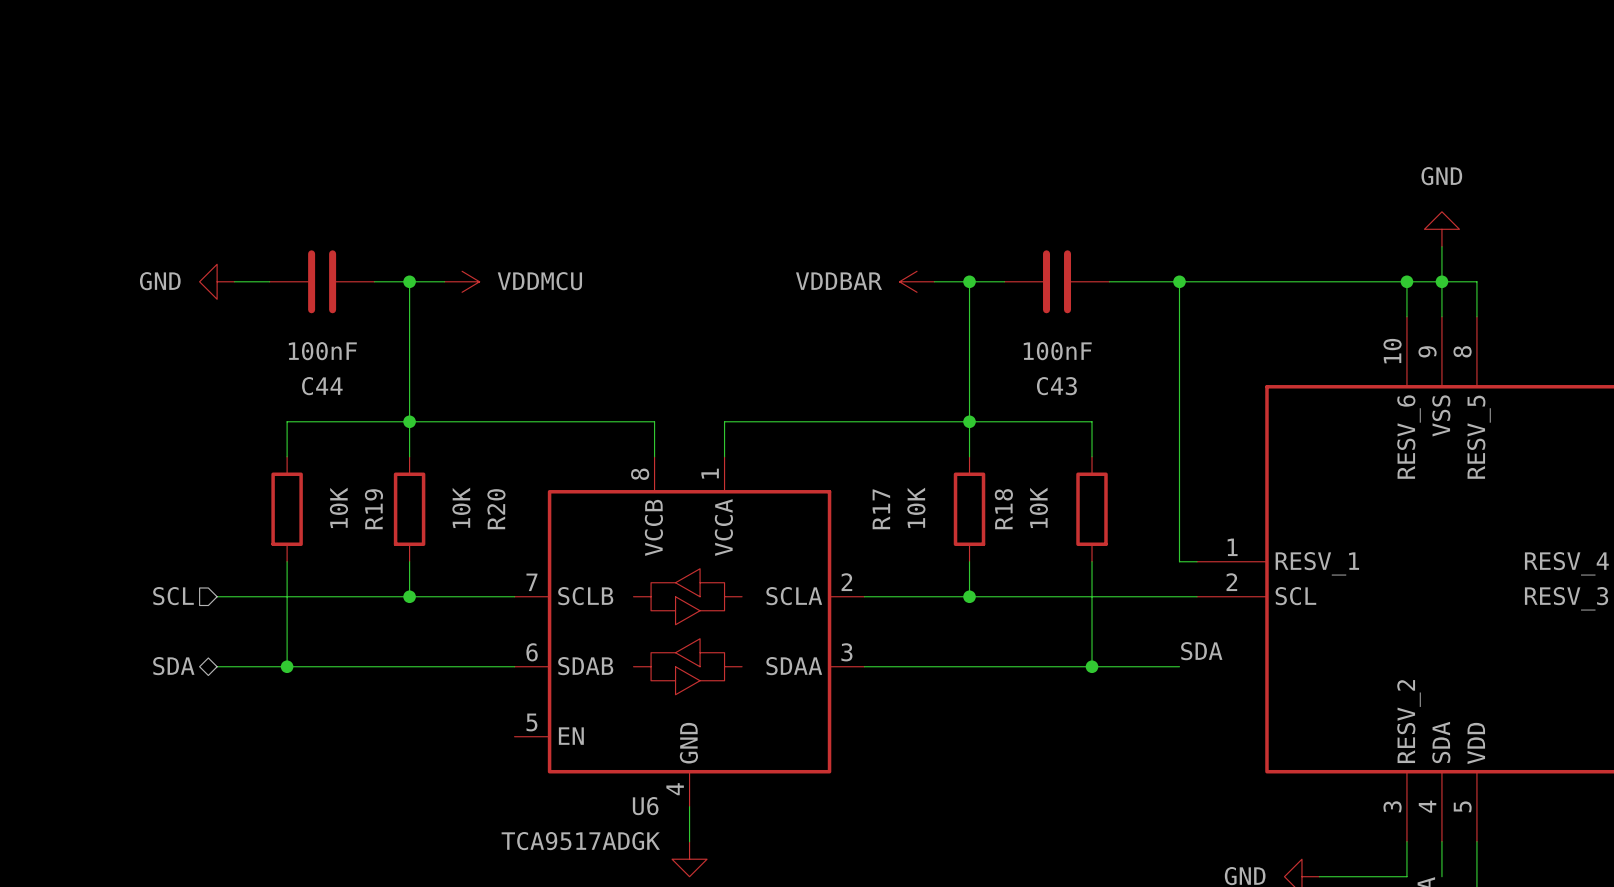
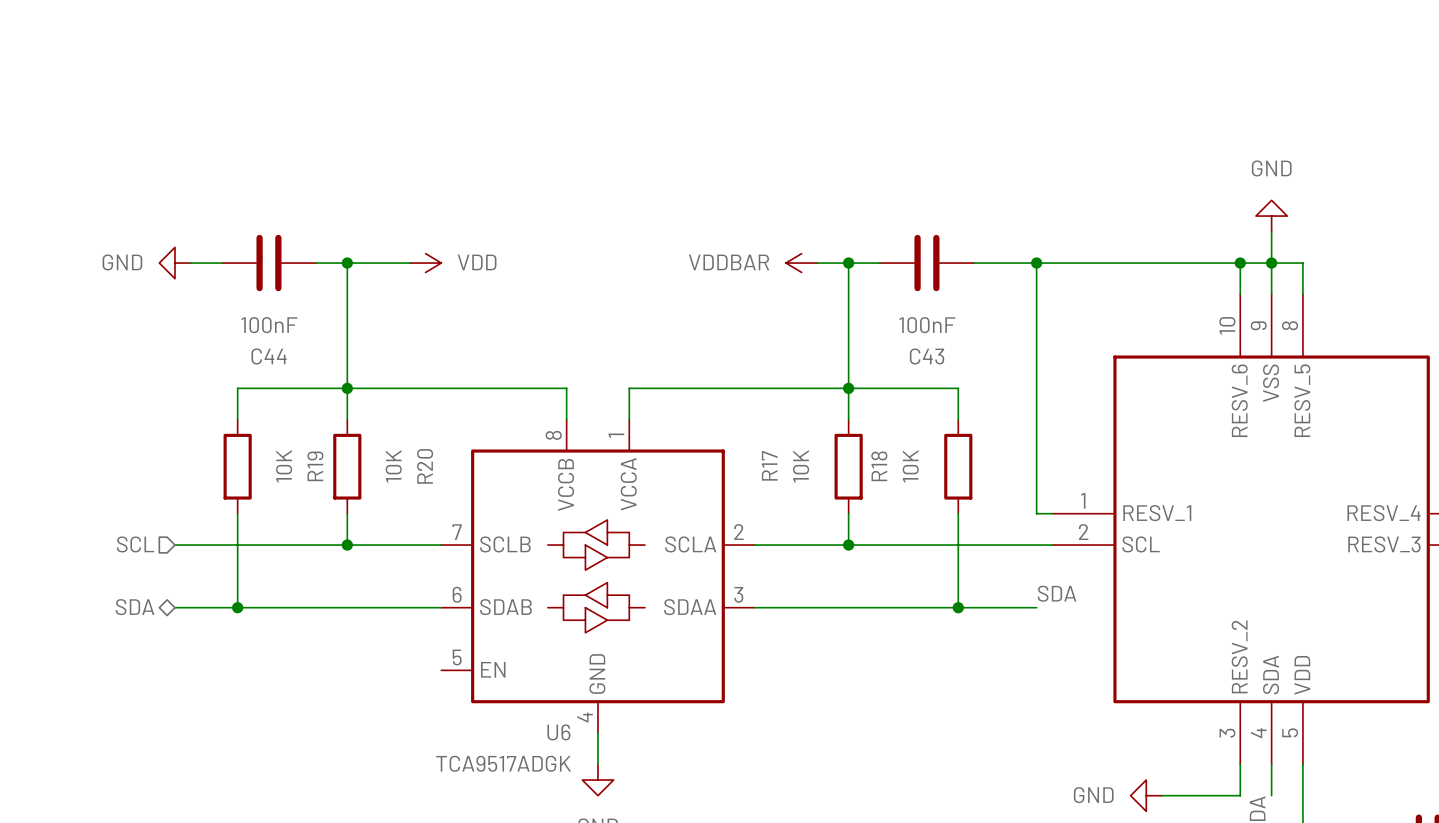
power symbol: VDDMCU (462, 281) -> none
power symbol: none -> VDD (425, 263)

